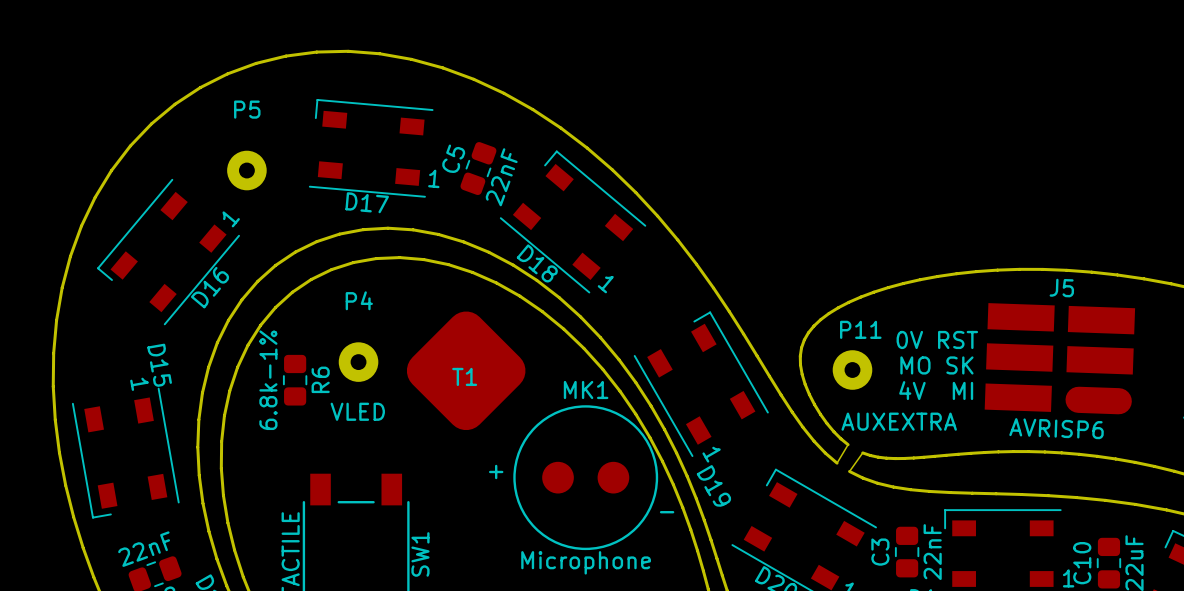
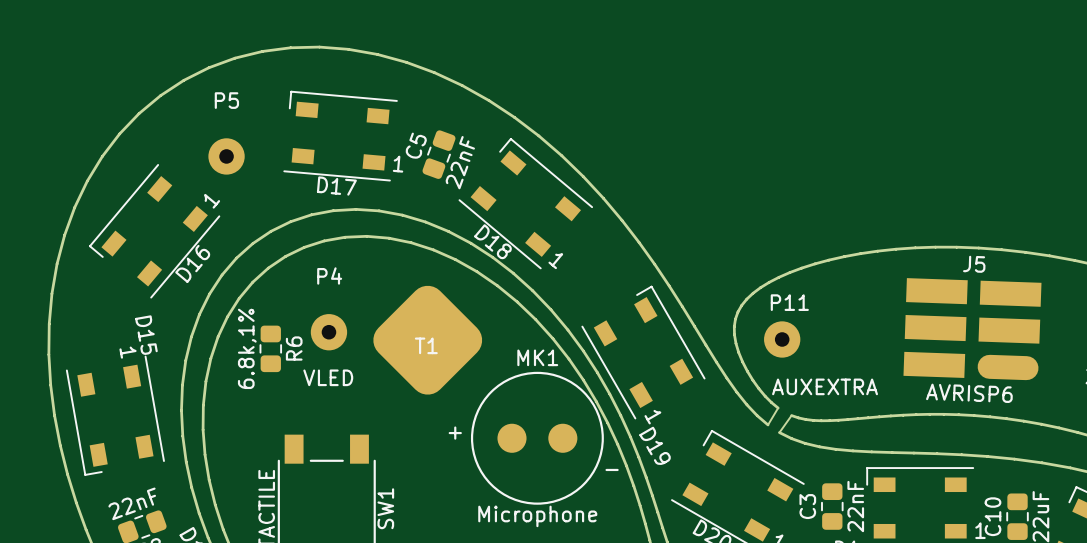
text: 0V RST (937, 339) -> none
text: MO SK (936, 365) -> none
R6 value: 6.8k-1% (268, 380) -> 6.8k,1% (247, 348)
text: 4V MI (936, 390) -> none

